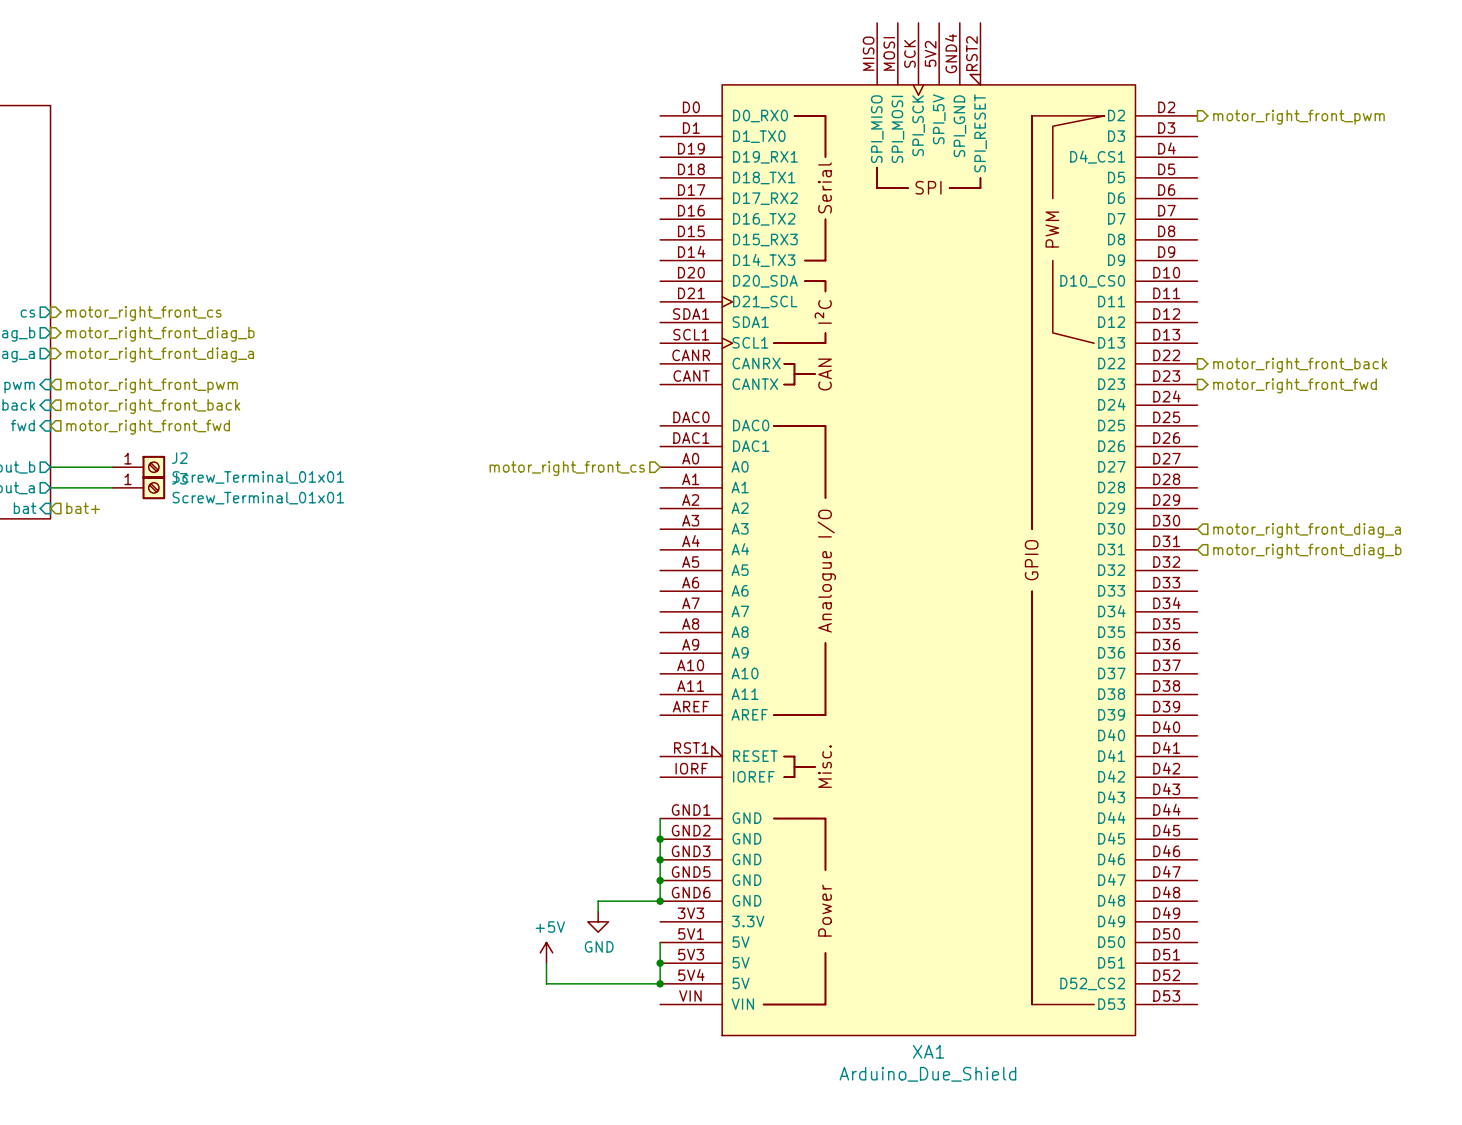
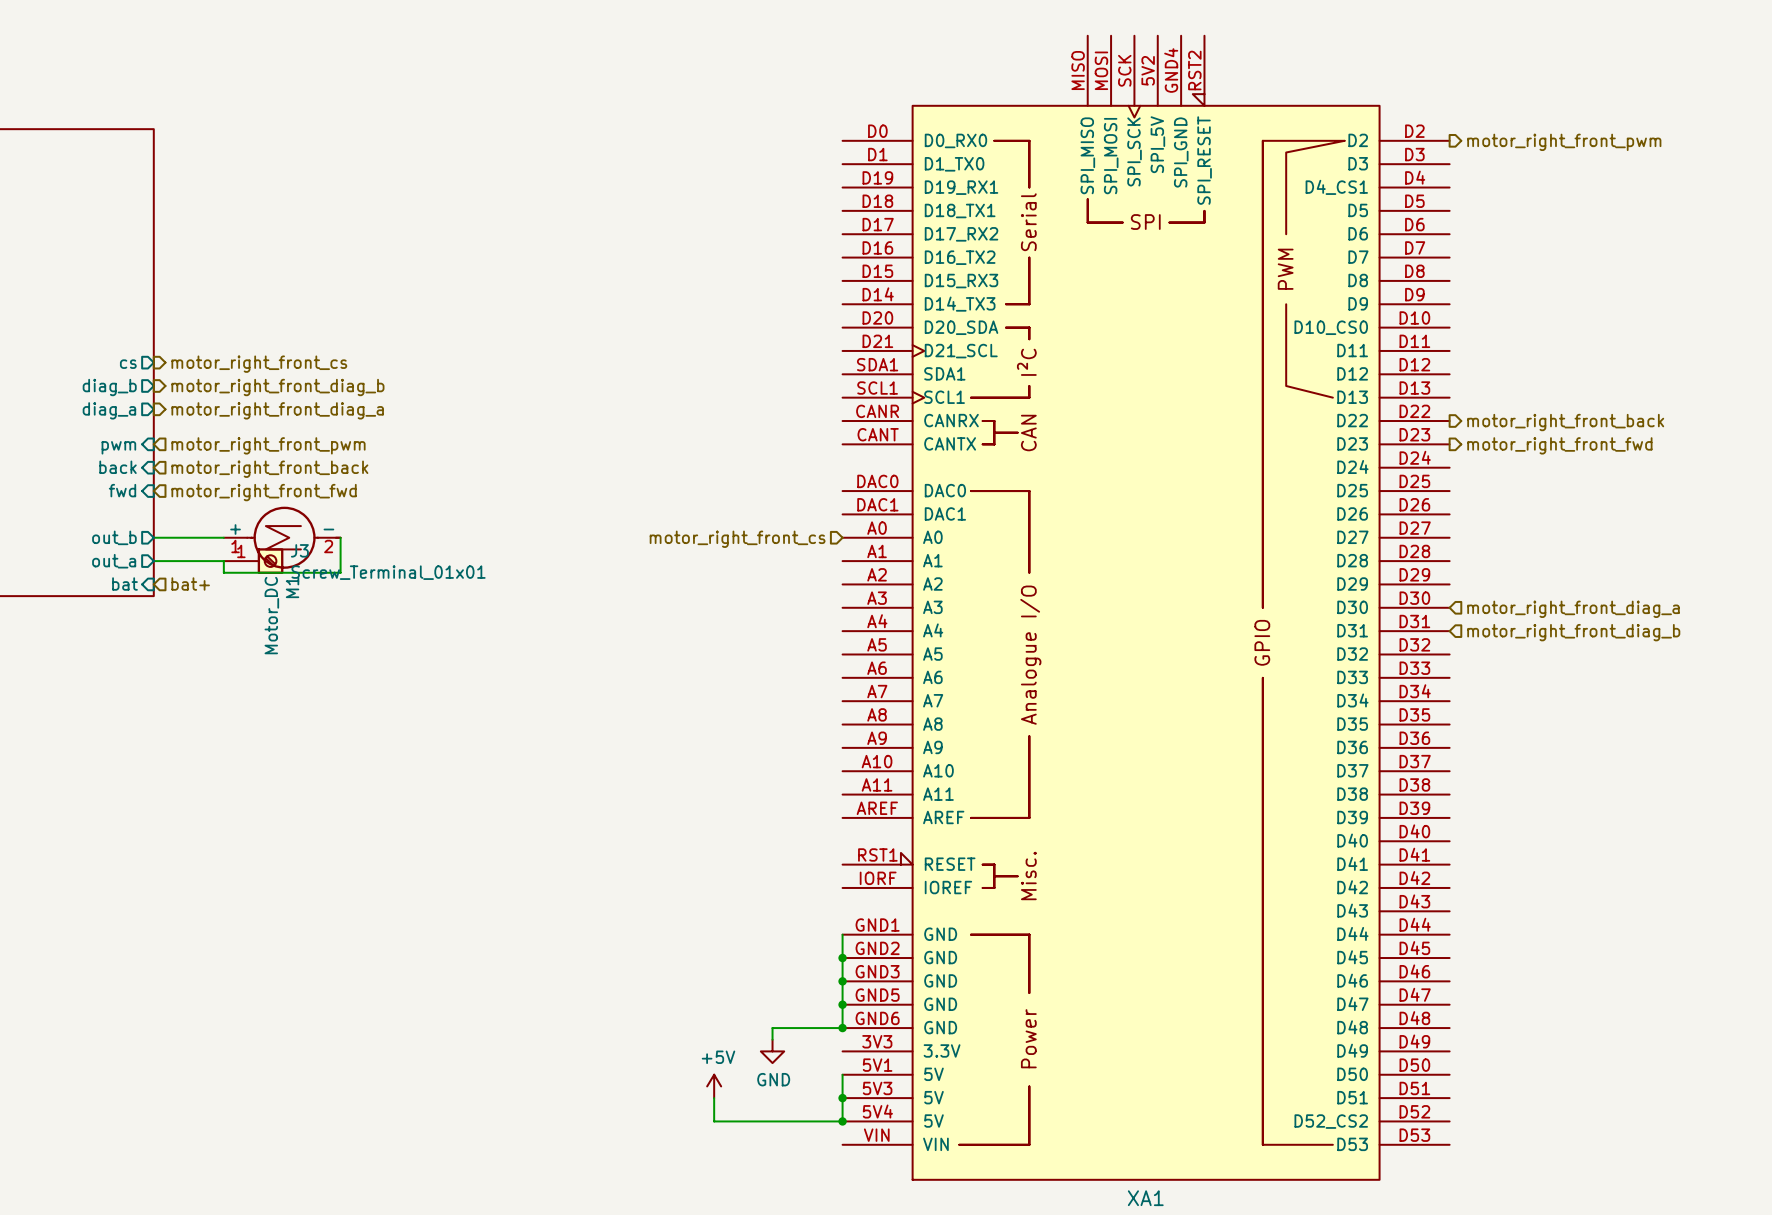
J2: Screw_Terminal_01x01 (138, 467) -> none
M1: none -> Motor_DC (282, 537)
wire: none -> (340, 537) (340, 572) (223, 572) (223, 561)

